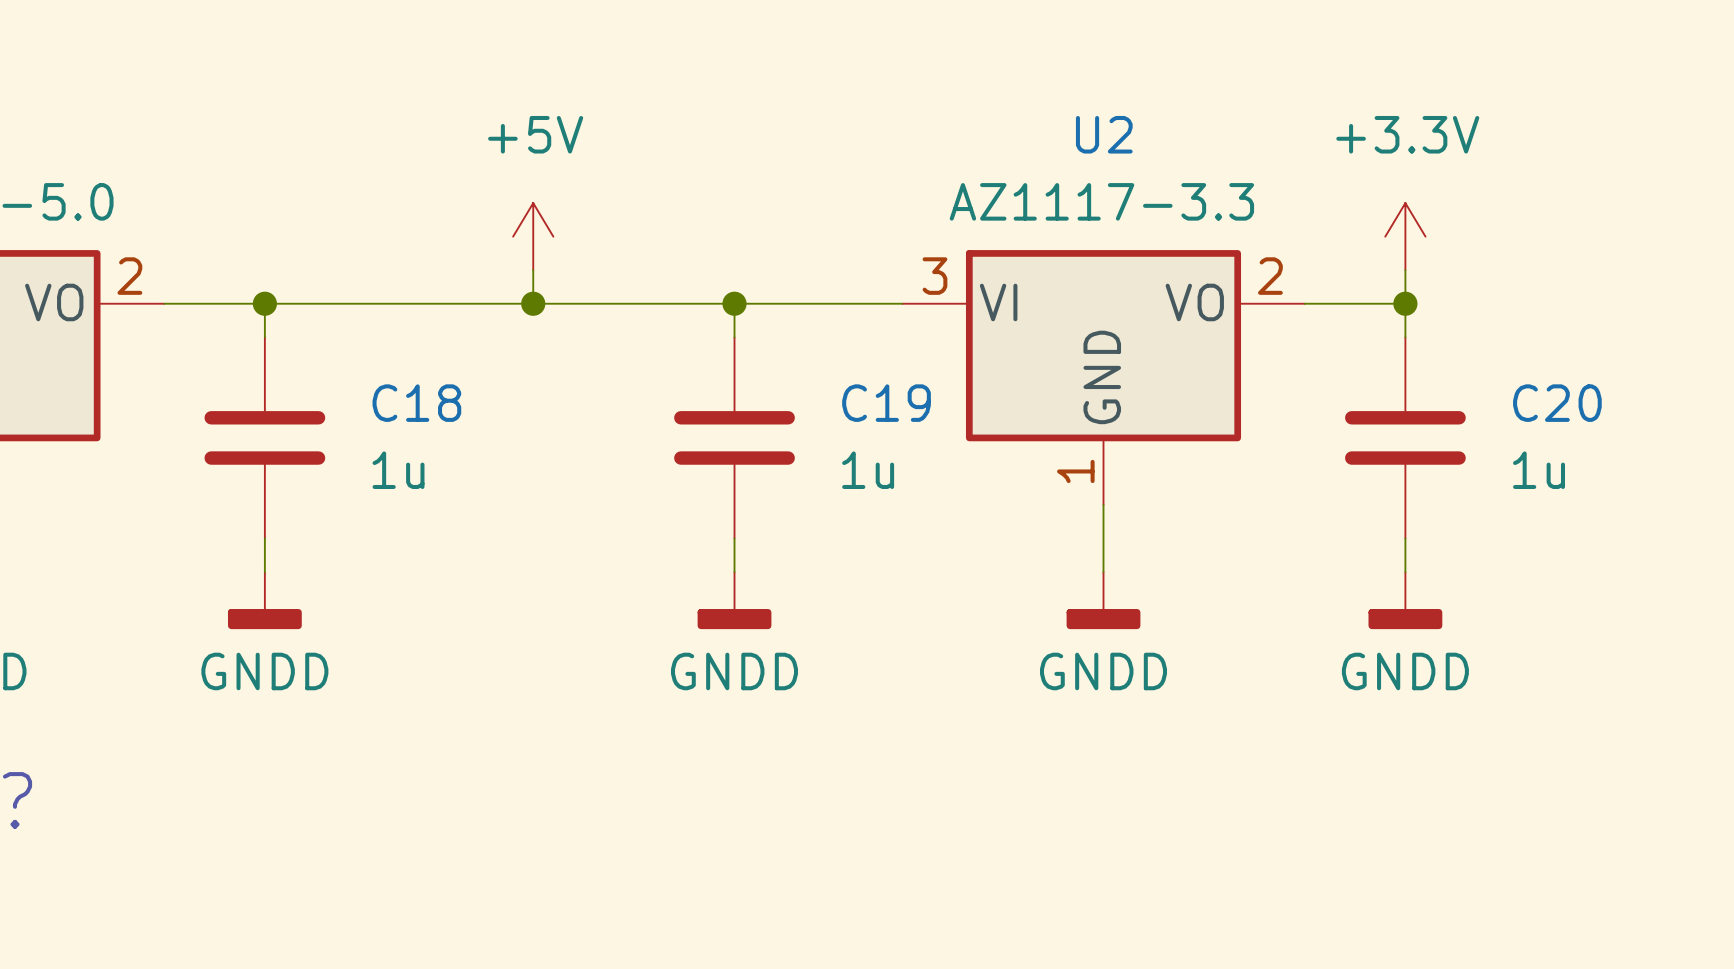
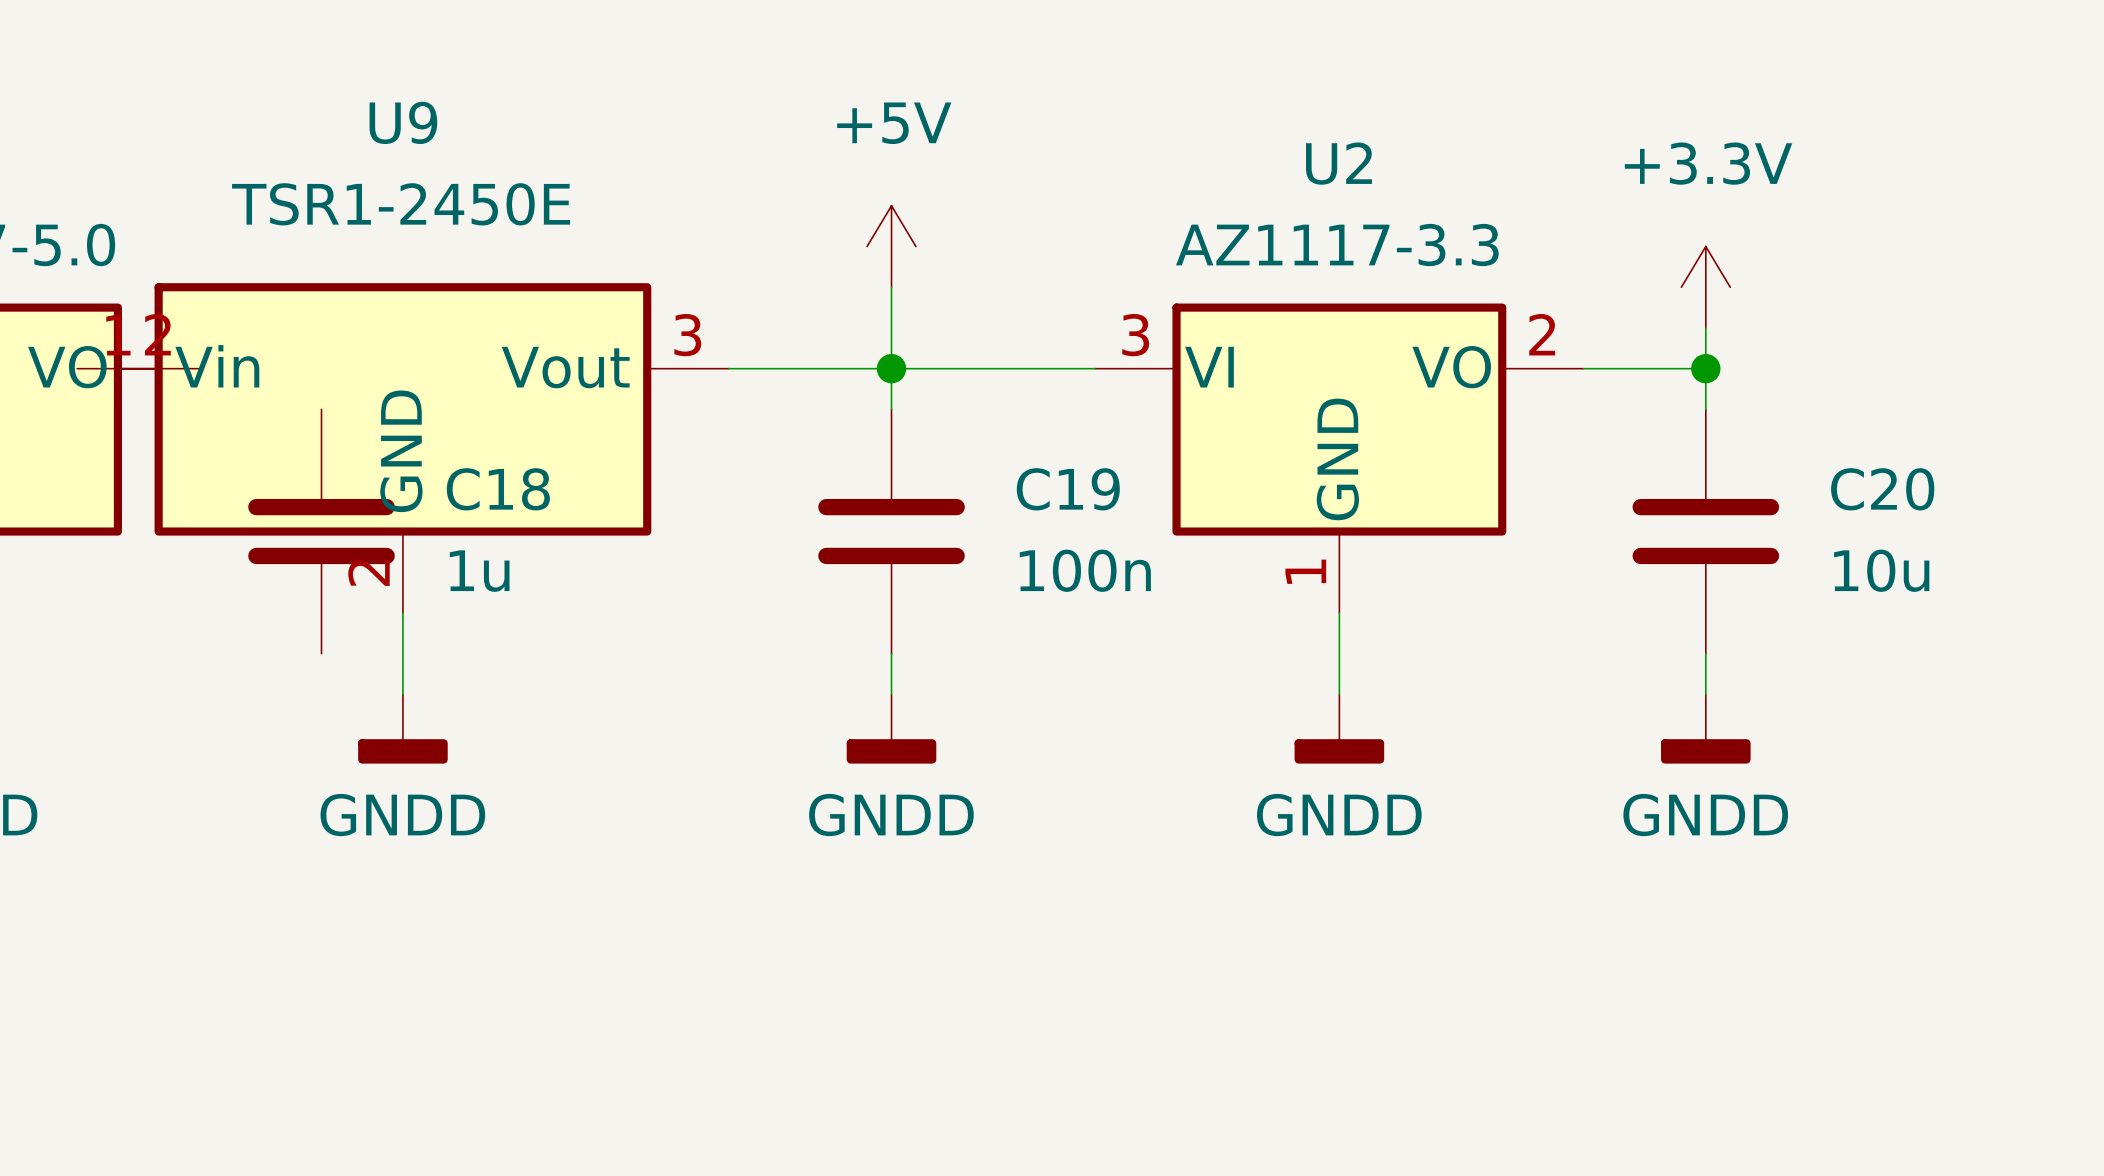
power symbol position: +5V (533, 236) -> +5V (891, 246)
wire: none -> (891, 287) (891, 368)
junction: (264, 303) -> none
junction: (533, 303) -> none
U9: none -> TSR1-2450E (402, 448)
C19 value: 1u (868, 470) -> 100n (1085, 570)
C20 value: 1u (1539, 470) -> 10u (1881, 570)
wire: none -> (402, 612) (402, 694)
wire: (264, 538) (264, 572) -> none
power symbol position: GNDD (264, 600) -> GNDD (402, 728)

